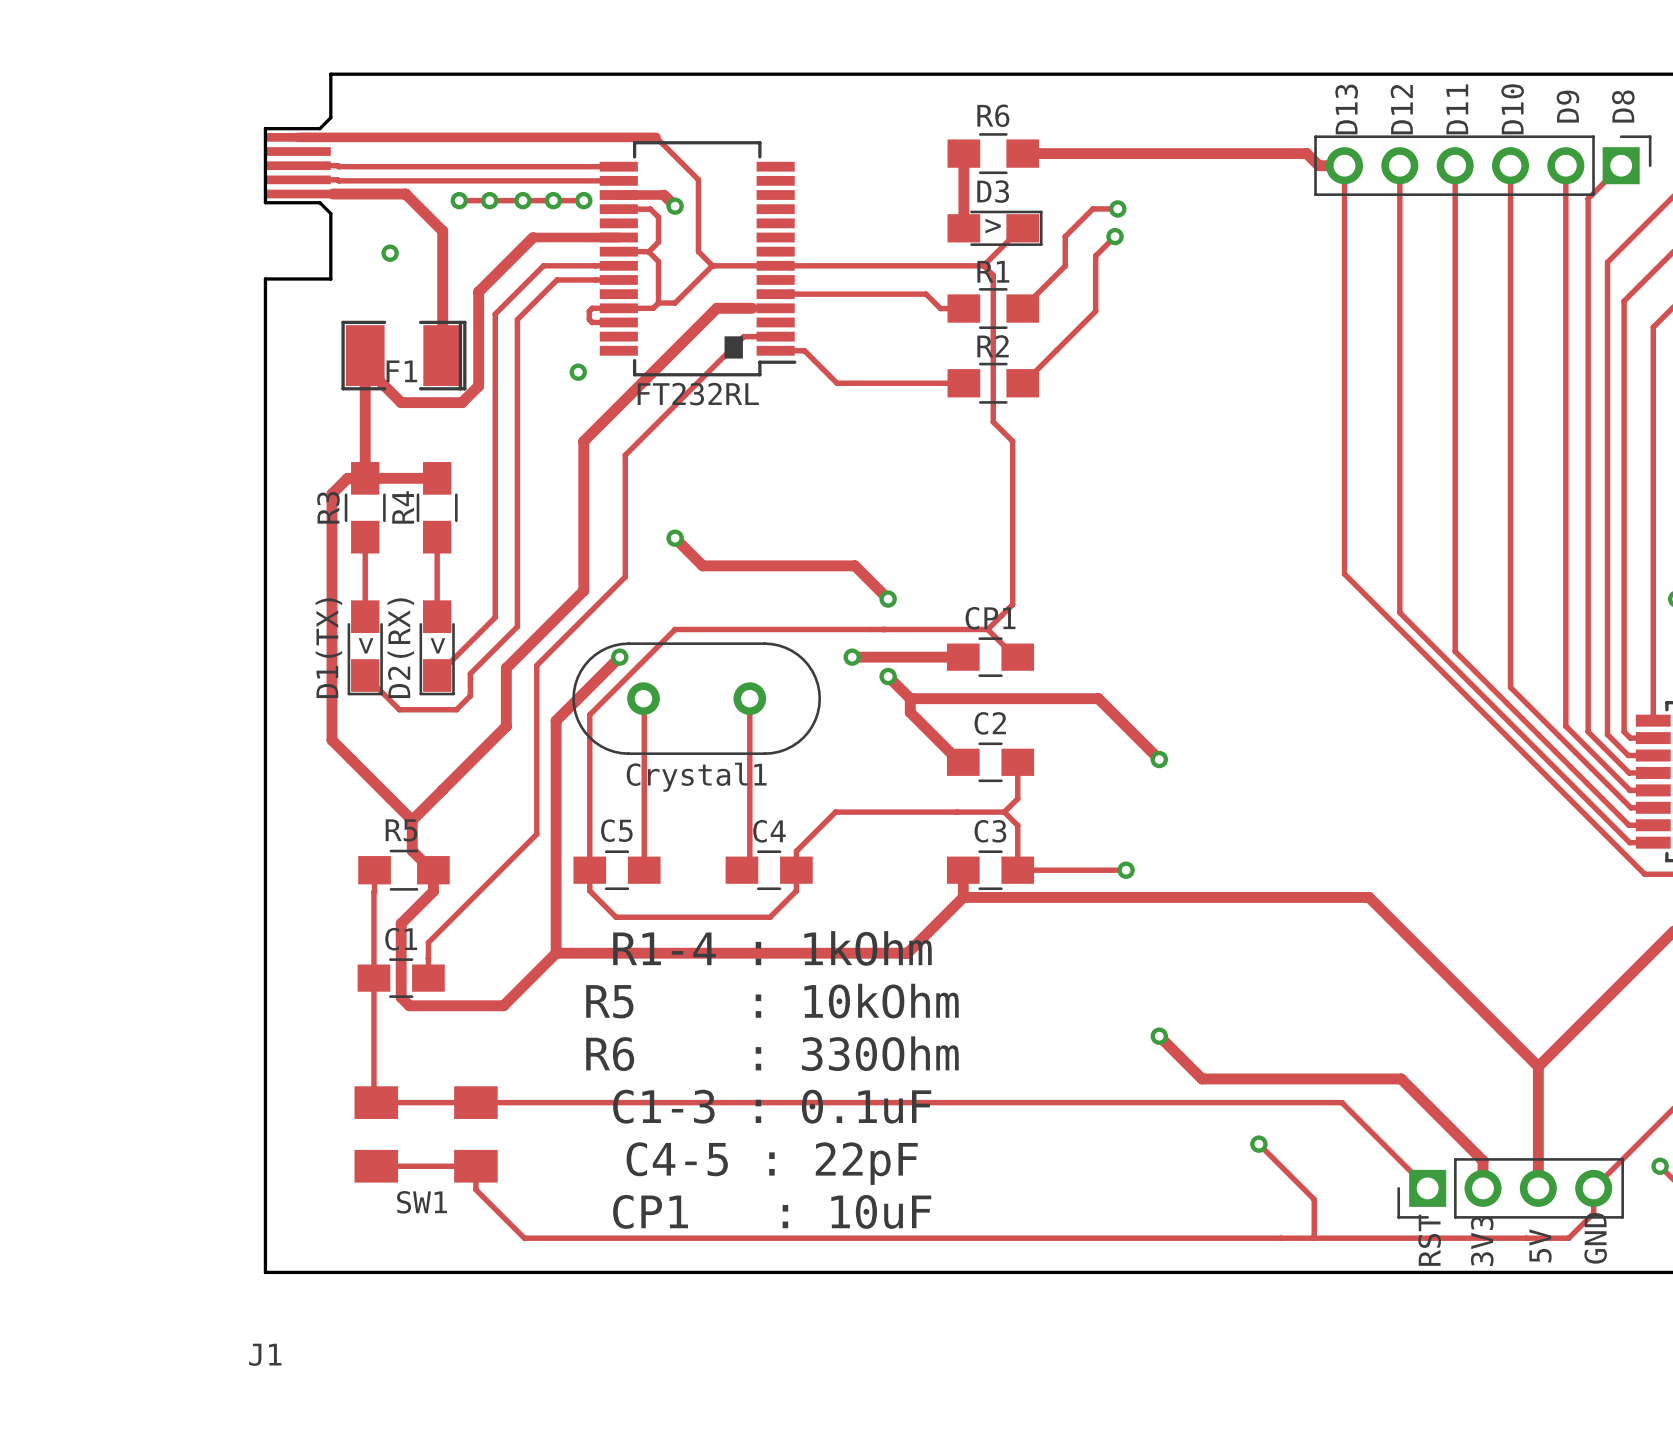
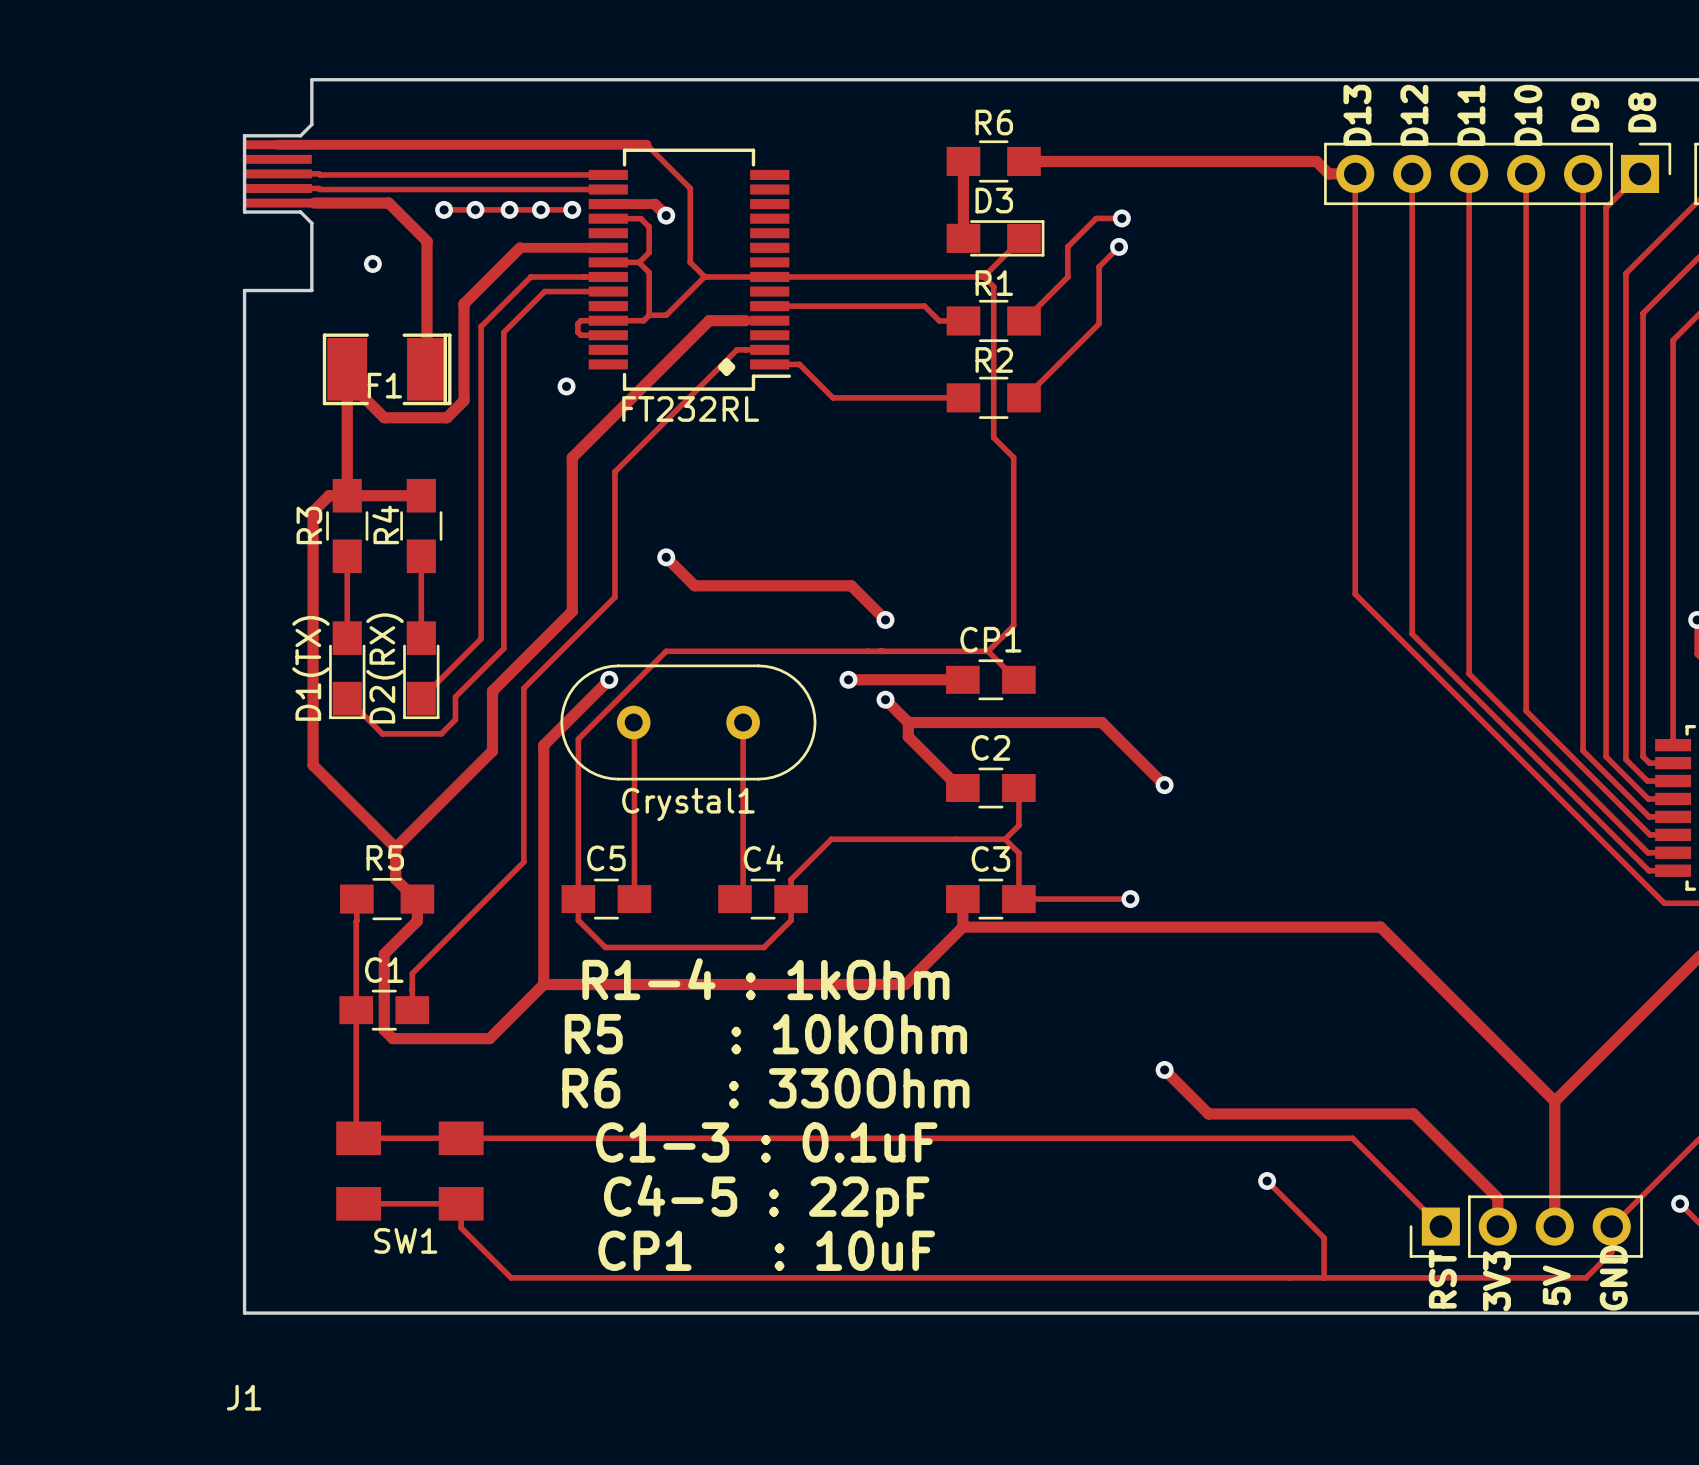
text: > (993, 226) -> none
text: > (366, 645) -> none
text: > (437, 645) -> none

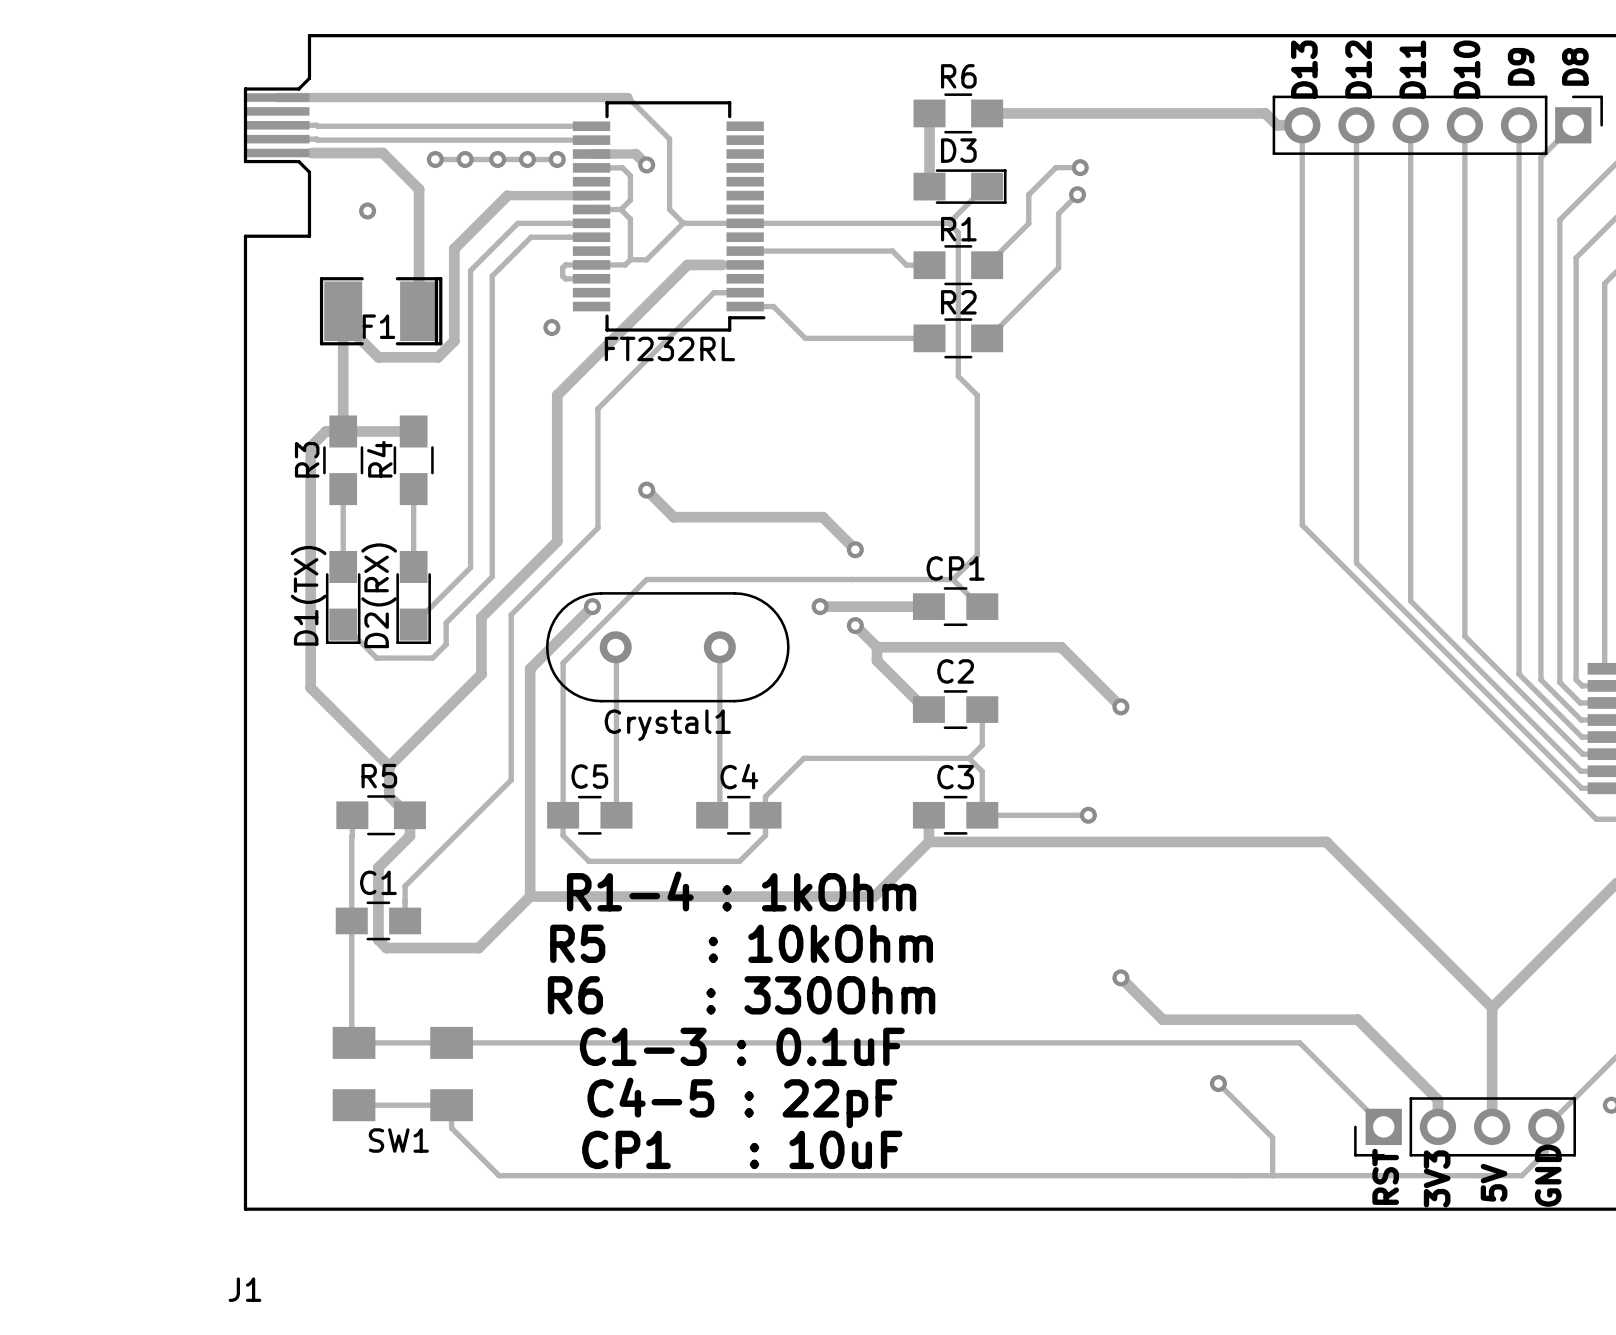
text: . (726, 367) -> none

